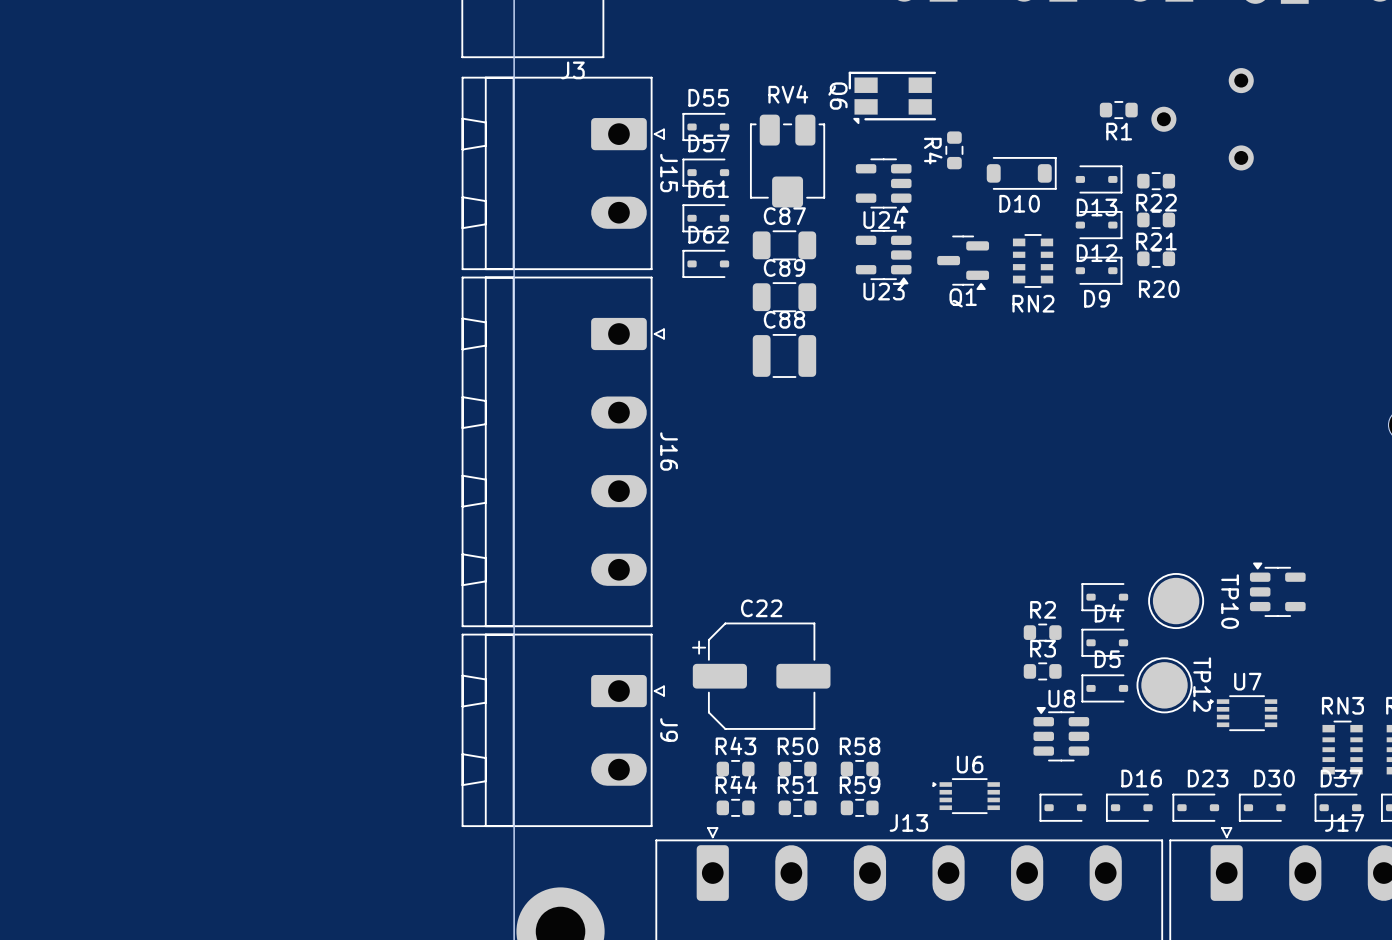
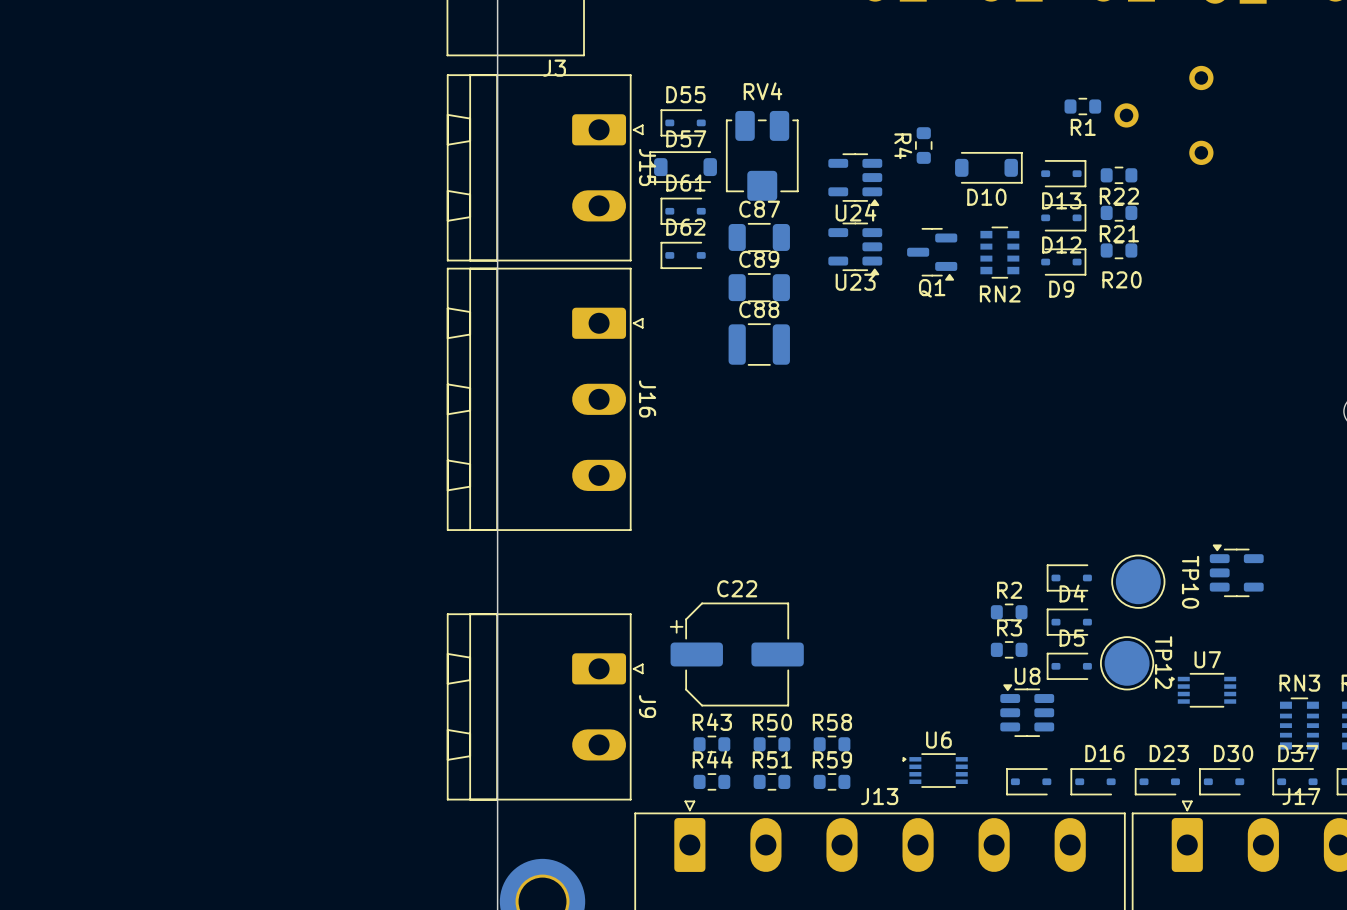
Q6: (892, 97) -> none
D57 footprint: [682, 158, 730, 187] -> [649, 151, 717, 183]
J16 footprint: [461, 276, 665, 628] -> [446, 267, 644, 531]

